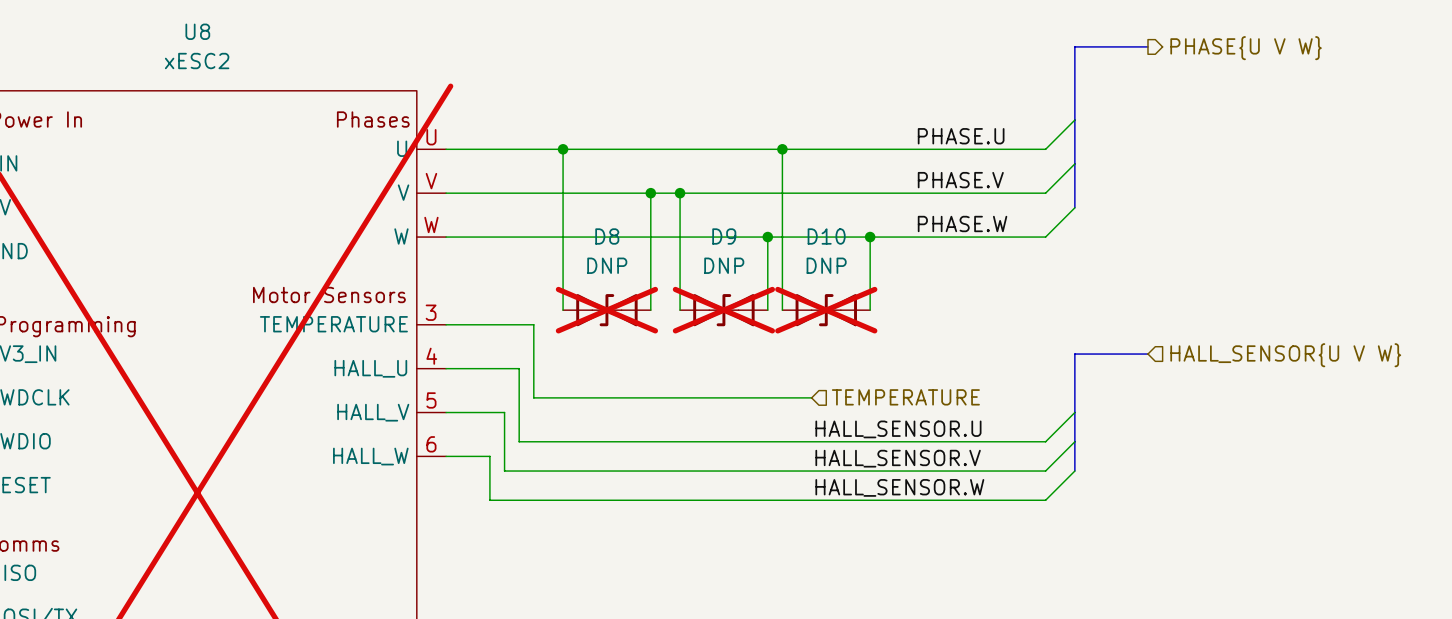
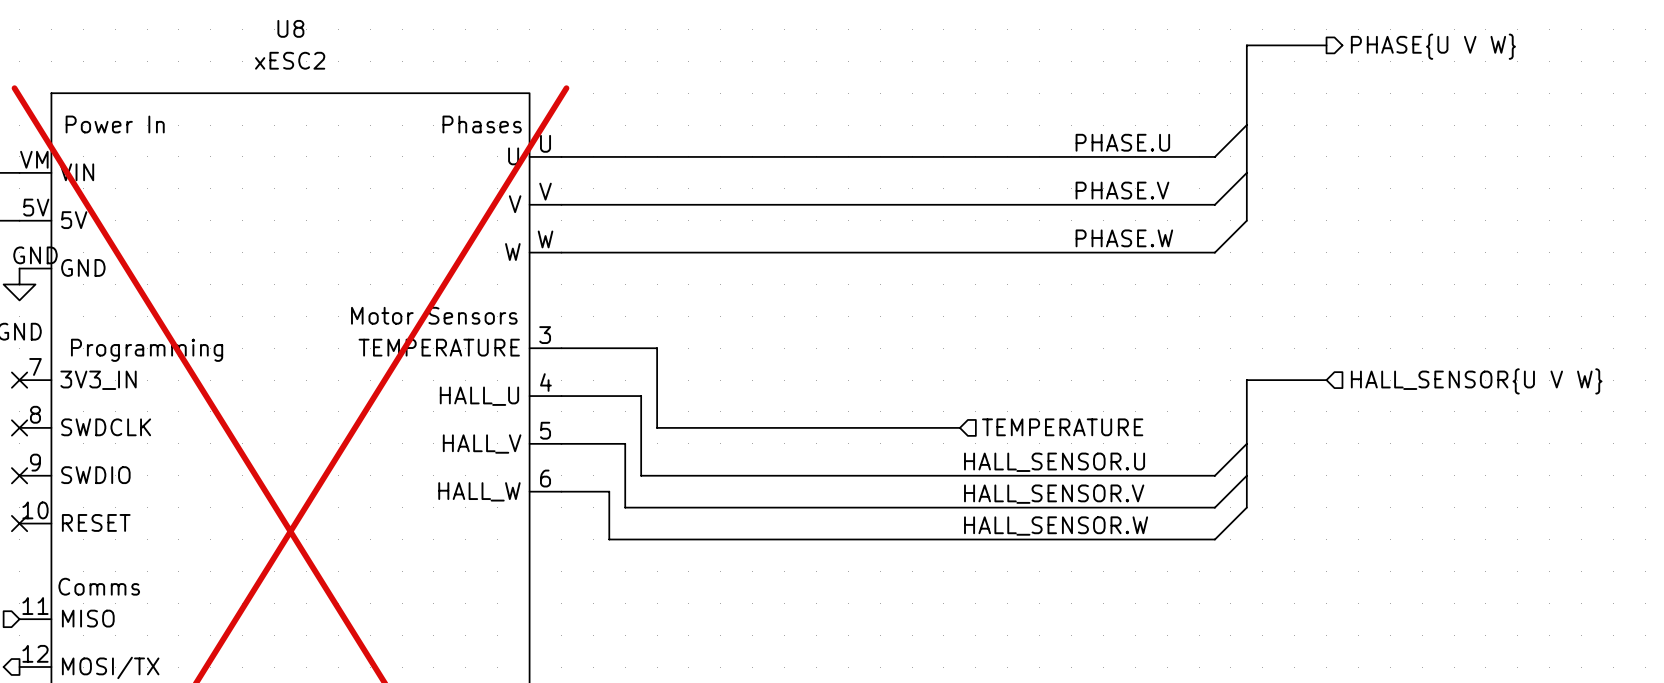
wire: (563, 149) (563, 310) -> none
junction: (563, 149) -> none
wire: (782, 149) (782, 310) -> none
junction: (782, 149) -> none
wire: (650, 193) (650, 310) -> none
junction: (650, 193) -> none
wire: (680, 193) (680, 310) -> none
junction: (680, 193) -> none
wire: (767, 237) (767, 310) -> none
junction: (767, 237) -> none
wire: (870, 237) (870, 310) -> none
junction: (870, 237) -> none
D8: DNP (606, 310) -> none
D9: DNP (723, 310) -> none
D10: DNP (826, 310) -> none

